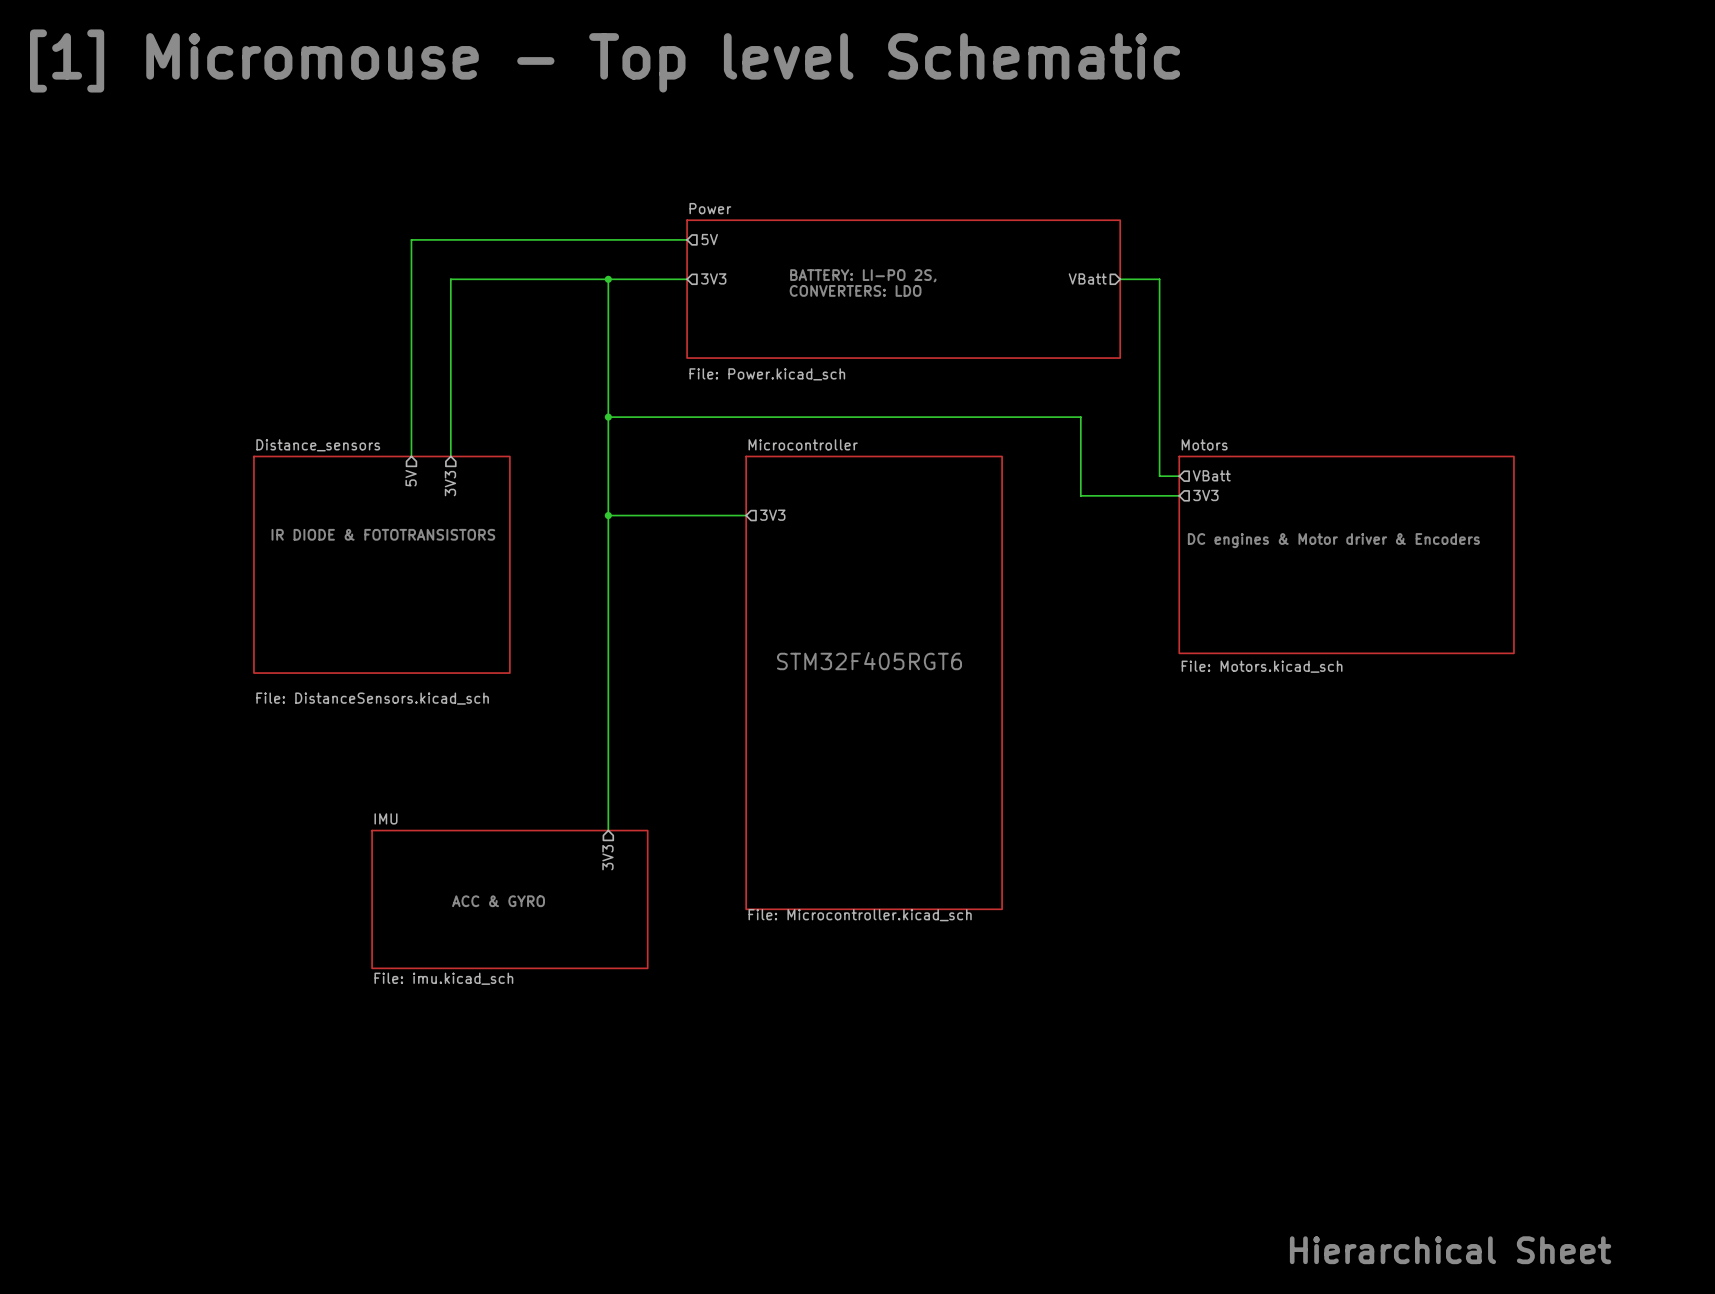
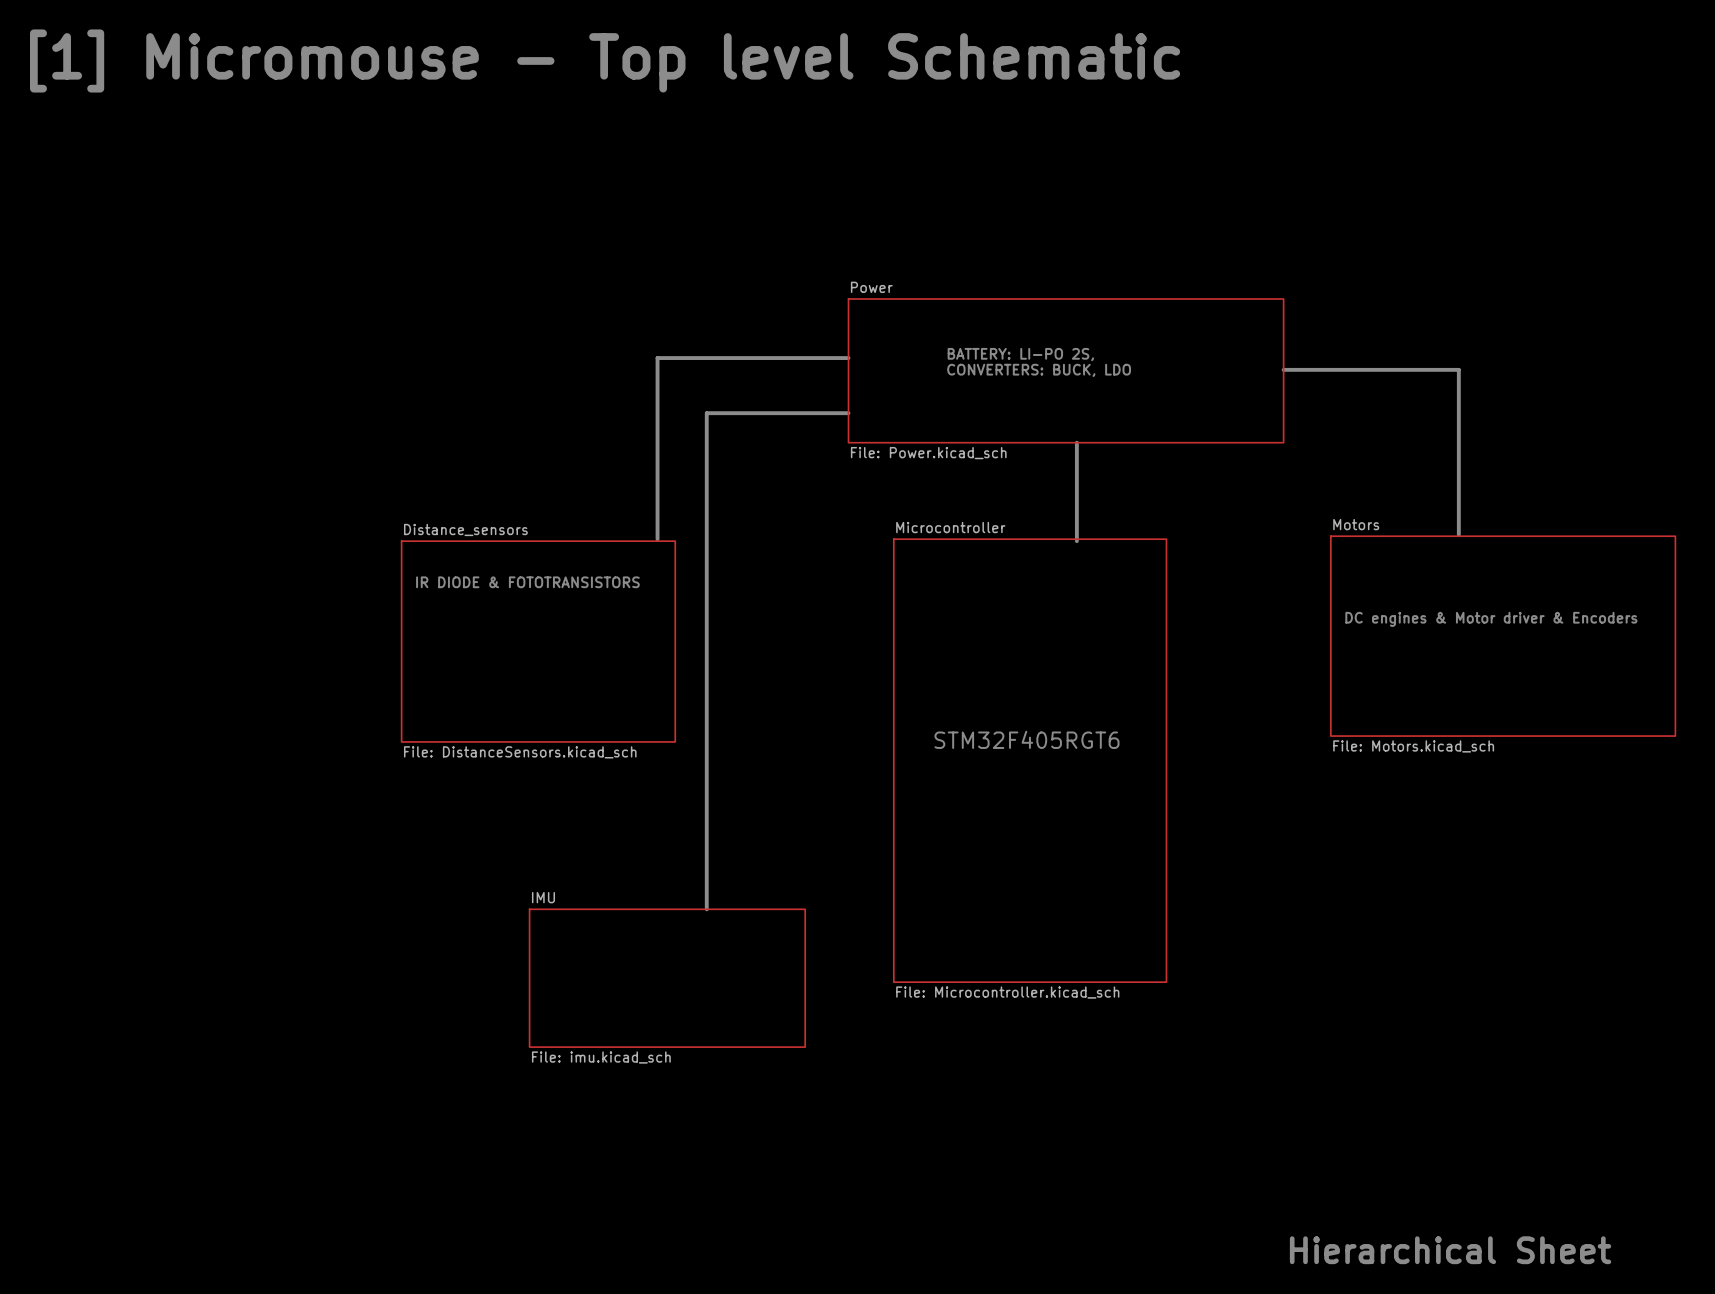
wire: (687, 239) (411, 239) (411, 456) -> none
hierarchical label: 5V (709, 239) -> none
text position: BATTERY: LI-PO 2S, (863, 275) -> BATTERY: LI-PO 2S, (1020, 354)
hierarchical label: 3V3 (713, 278) -> none
hierarchical label: VBatt (1087, 278) -> none
wire: (608, 279) (608, 830) -> none
junction: (608, 279) -> none
wire: (687, 279) (450, 279) (450, 456) -> none
wire: (1120, 279) (1159, 279) (1159, 476) (1179, 476) -> none
sheet Power: File: Power.kicad_sch (903, 289) -> none
text: CONVERTERS: LDO (855, 290) -> none
line: none -> (848, 358) (657, 358) (657, 539)
line: none -> (1283, 369) (1458, 369) (1458, 535)
text: none -> CONVERTERS: BUCK, LDO (1039, 370)
sheet Power: none -> File: Power.kicad_sch (1066, 370)
line: none -> (848, 413) (706, 413) (706, 909)
wire: (608, 417) (1080, 417) (1080, 495) (1179, 495) -> none
junction: (608, 417) -> none
line: none -> (1076, 442) (1076, 541)
hierarchical label: VBatt (1211, 475) -> none
hierarchical label: 5V (411, 478) -> none
hierarchical label: 3V3 (450, 483) -> none
hierarchical label: 3V3 (1205, 495) -> none
wire: (608, 515) (746, 515) -> none
junction: (608, 515) -> none
hierarchical label: 3V3 (772, 515) -> none
text position: IR DIODE & FOTOTRANSISTORS (383, 534) -> IR DIODE & FOTOTRANSISTORS (527, 582)
text position: DC engines & Motor driver & Encoders (1333, 540) -> DC engines & Motor driver & Encoders (1491, 619)
sheet Motors: File: Motors.kicad_sch (1346, 554) -> none
sheet Distance_sensors: File: DistanceSensors.kicad_sch (381, 564) -> none
sheet Motors: none -> File: Motors.kicad_sch (1503, 636)
sheet Distance_sensors: none -> File: DistanceSensors.kicad_sch (538, 641)
text position: STM32F405RGT6 (869, 661) -> STM32F405RGT6 (1026, 739)
sheet Microcontroller: File: Microcontroller.kicad_sch (874, 682) -> none
sheet Microcontroller: none -> File: Microcontroller.kicad_sch (1030, 760)
hierarchical label: 3V3 (607, 857) -> none
sheet IMU position: (509, 899) -> (667, 978)
text: ACC & GYRO (498, 901) -> none

